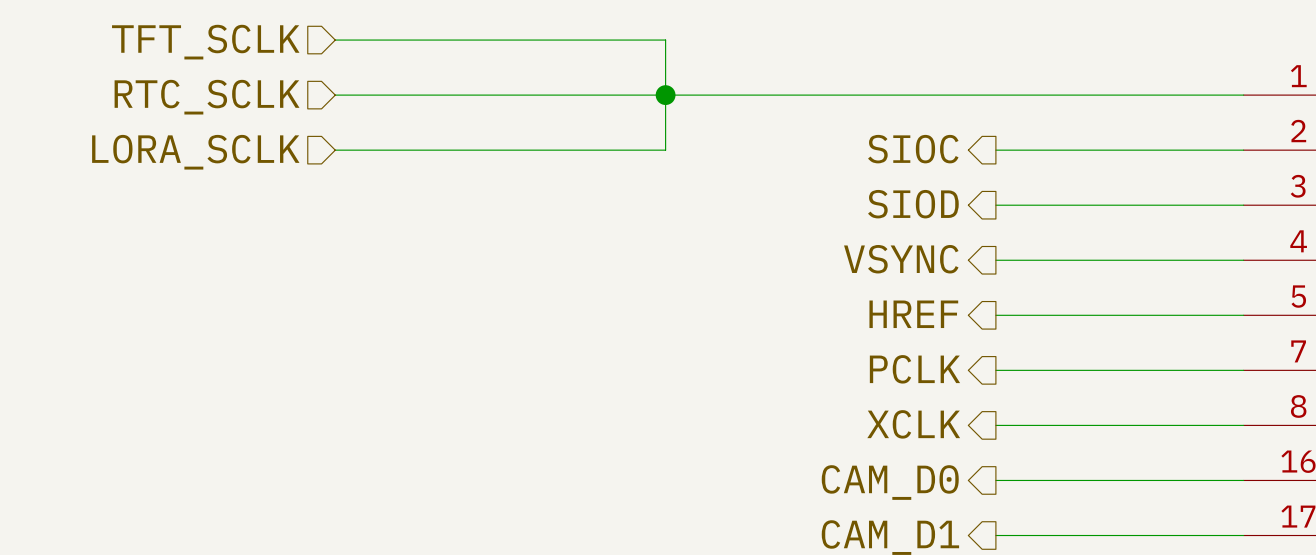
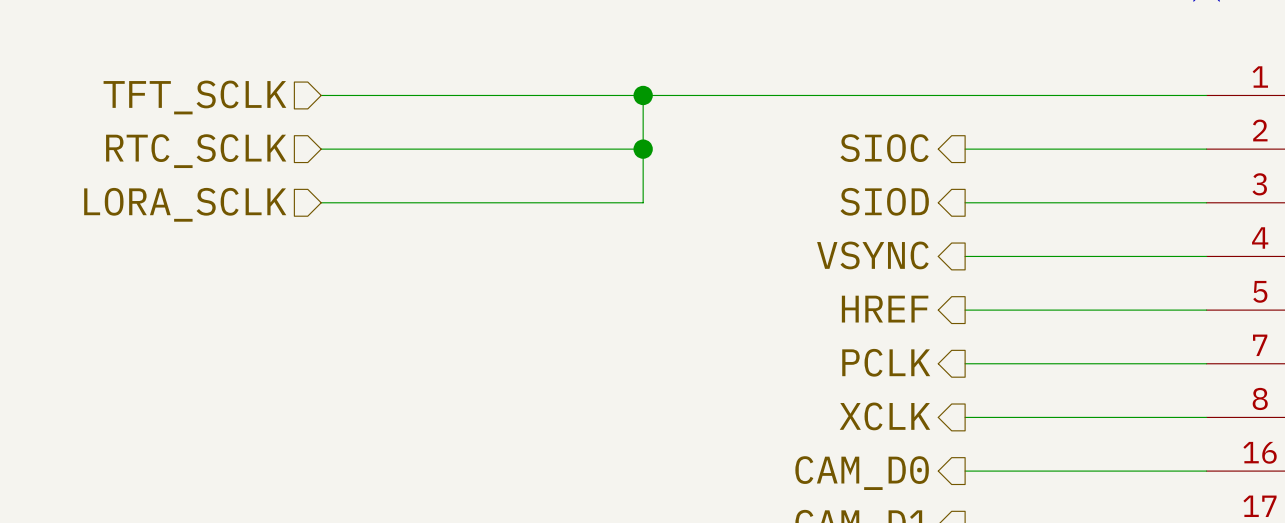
wire: (335, 40) (665, 40) (665, 95) -> none
hierarchical label: TFT_SCLK (205, 42) -> none
hierarchical label: RTC_SCLK (207, 97) -> TFT_SCLK (194, 97)
wire: none -> (643, 149) (643, 202) (321, 202)
junction: none -> (643, 149)
hierarchical label: LORA_SCLK (195, 152) -> RTC_SCLK (196, 151)
hierarchical label: none -> LORA_SCLK (185, 204)

